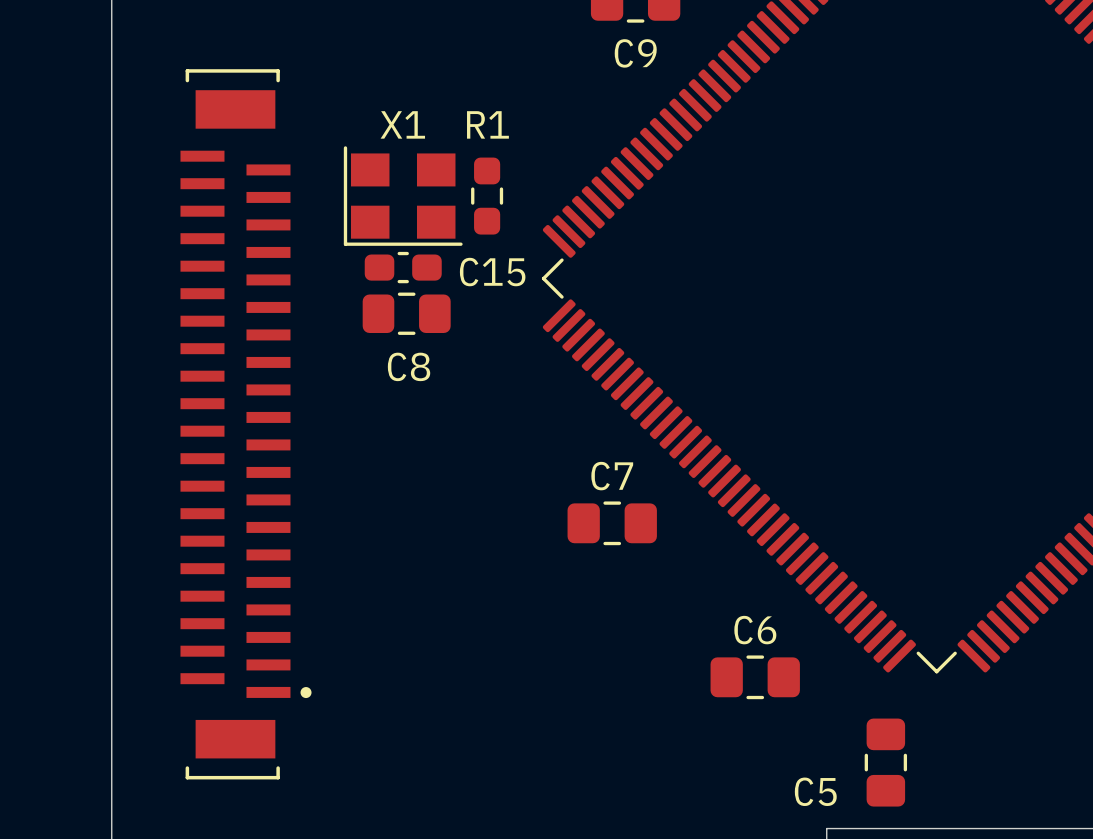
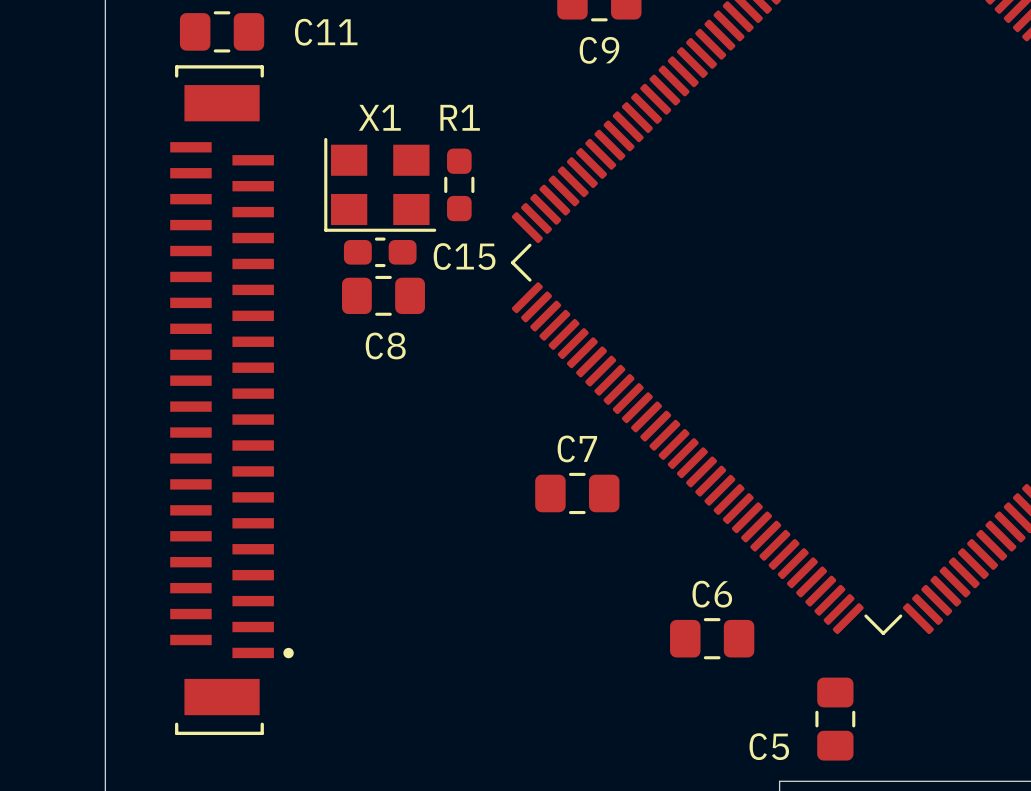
C11: none -> (222, 31)

